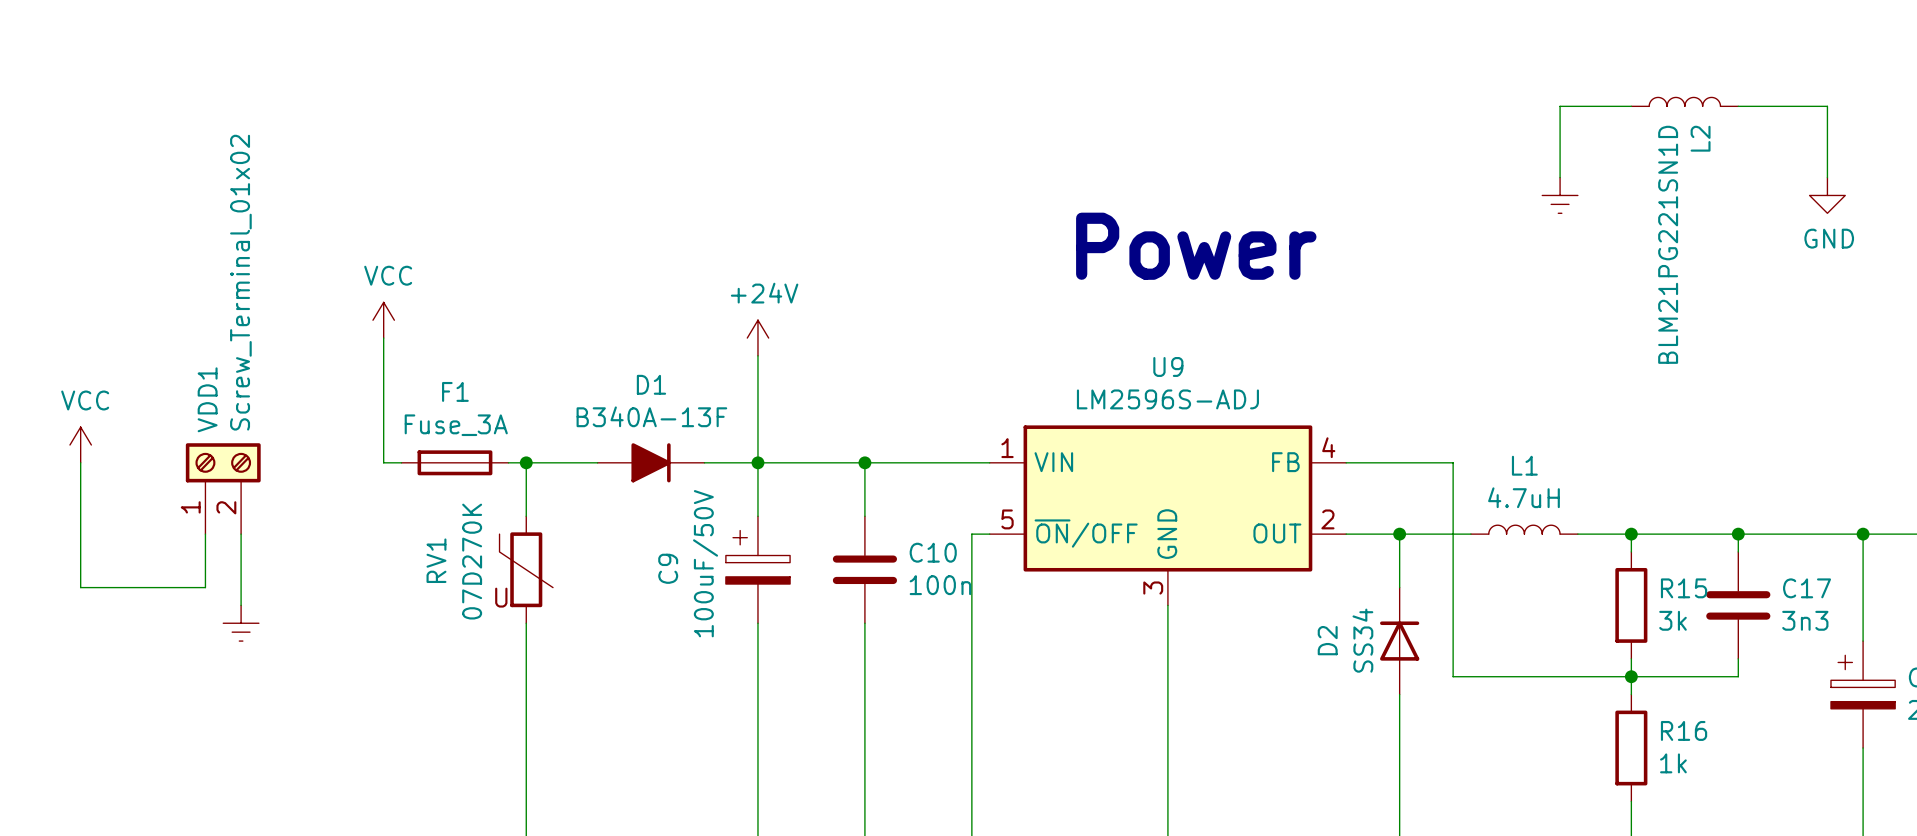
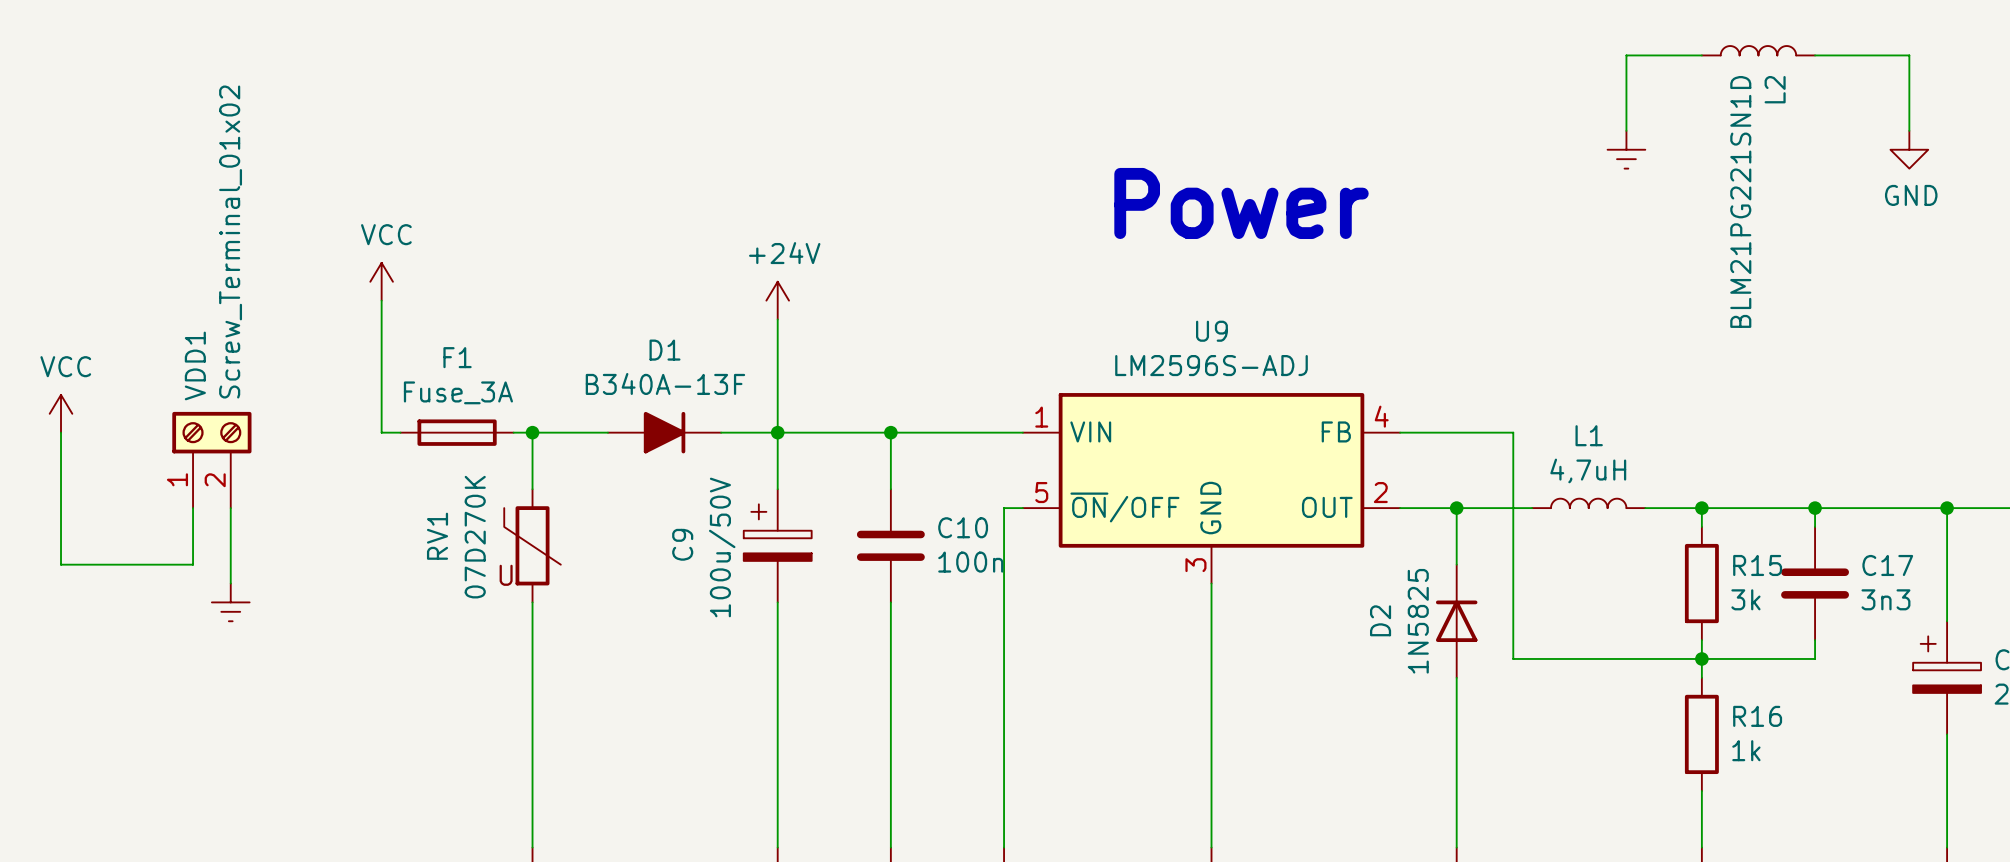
L1 value: 4.7uH (1523, 497) -> 4,7uH (1588, 470)
C9 value: 100uF/50V (705, 563) -> 100u/50V (722, 547)
D2 value: SS34 (1362, 640) -> 1N5825 (1418, 621)

